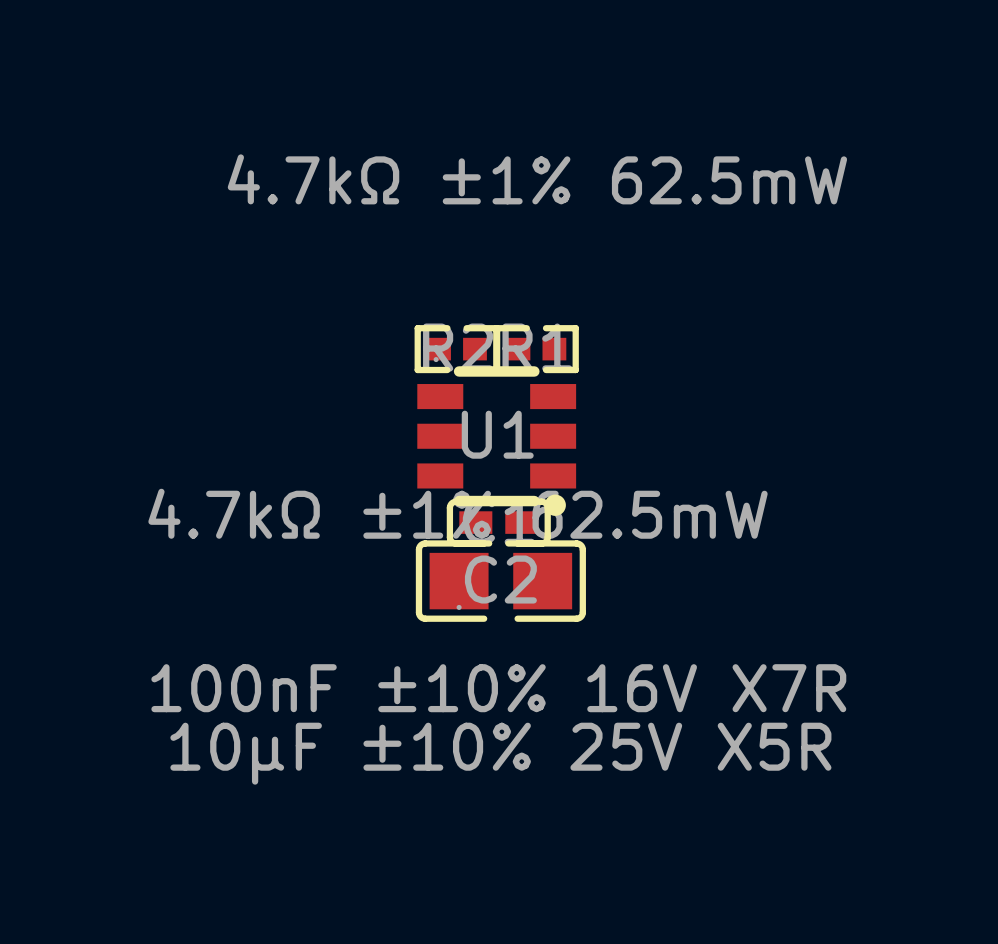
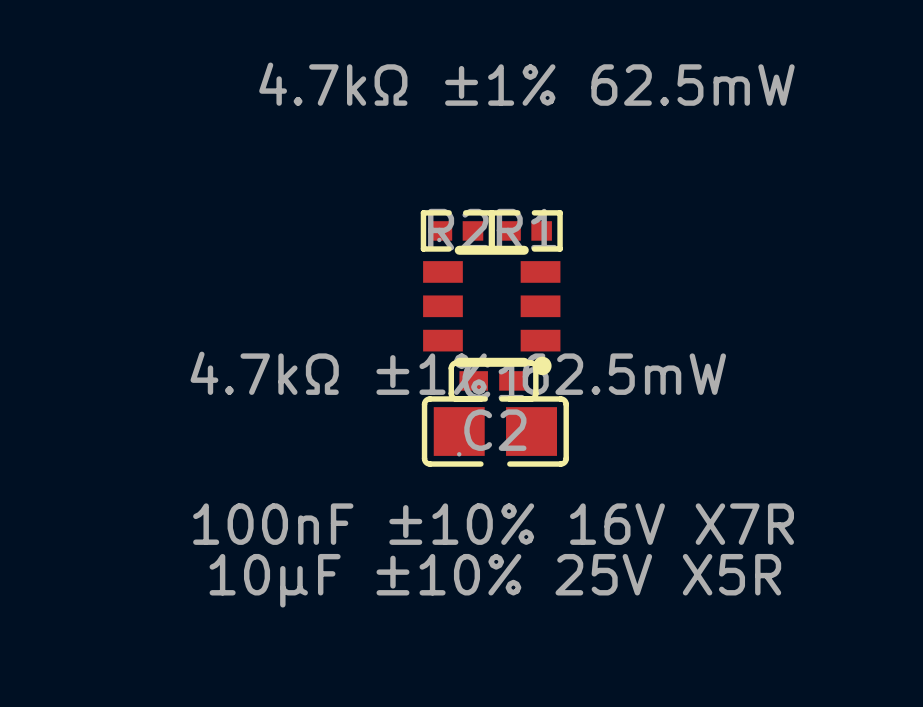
U1 name: U1 (497, 434) -> none

